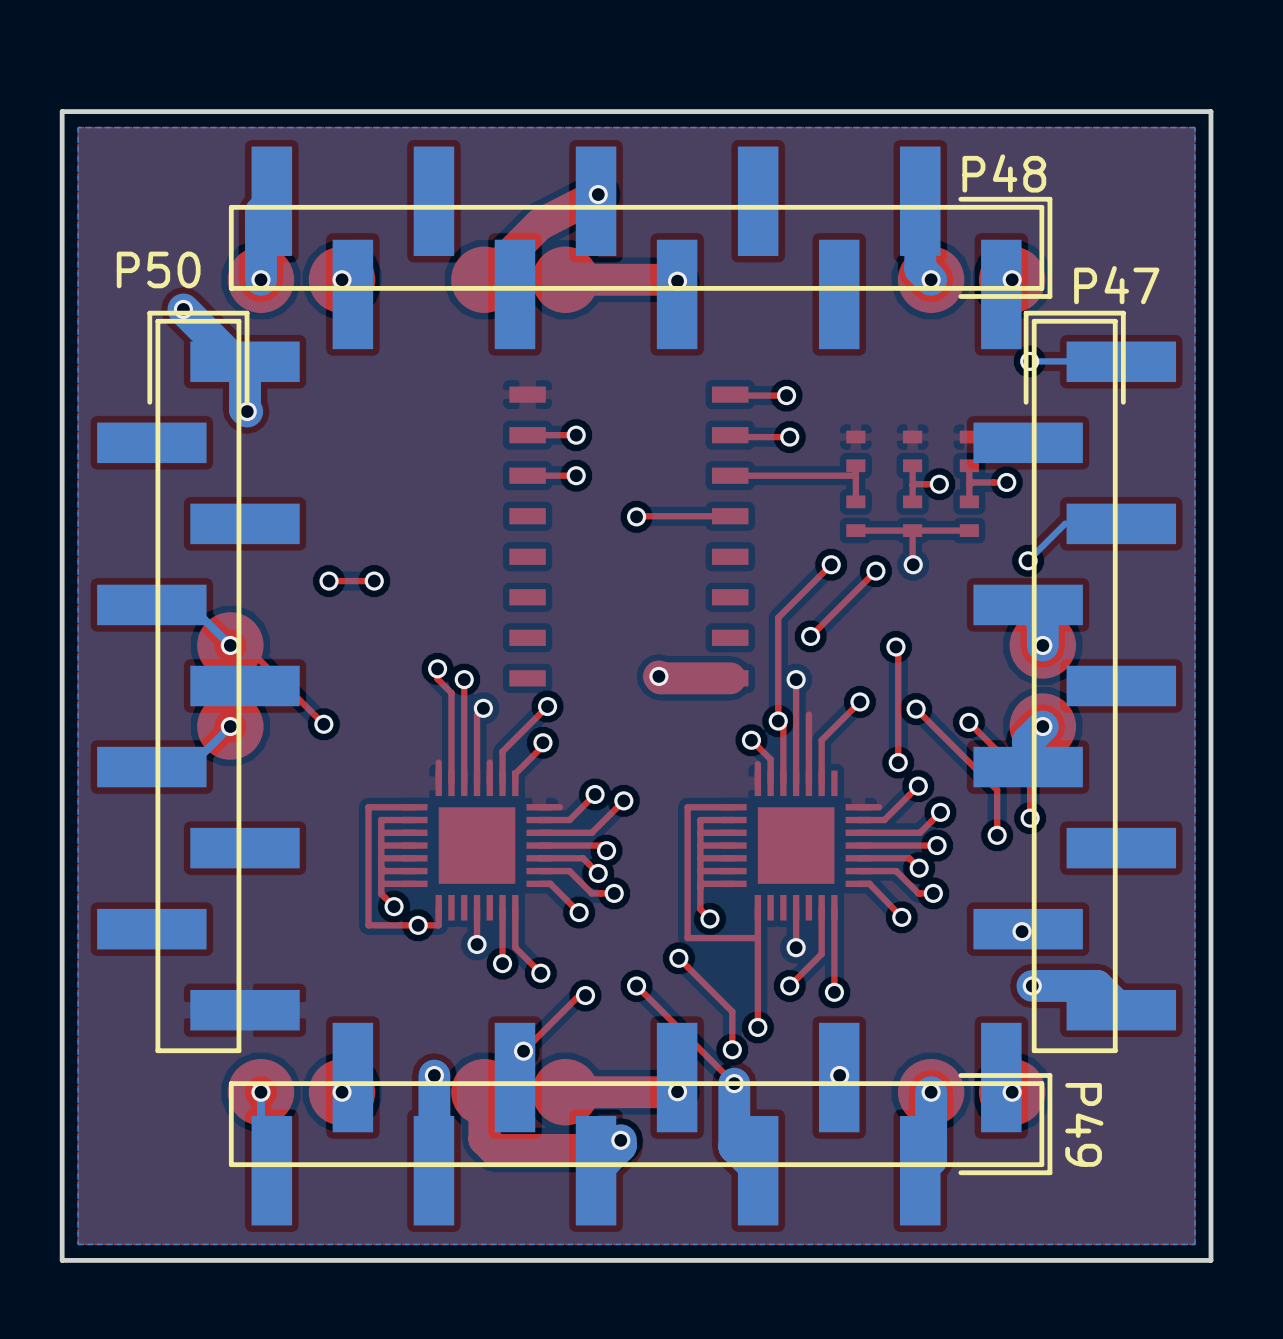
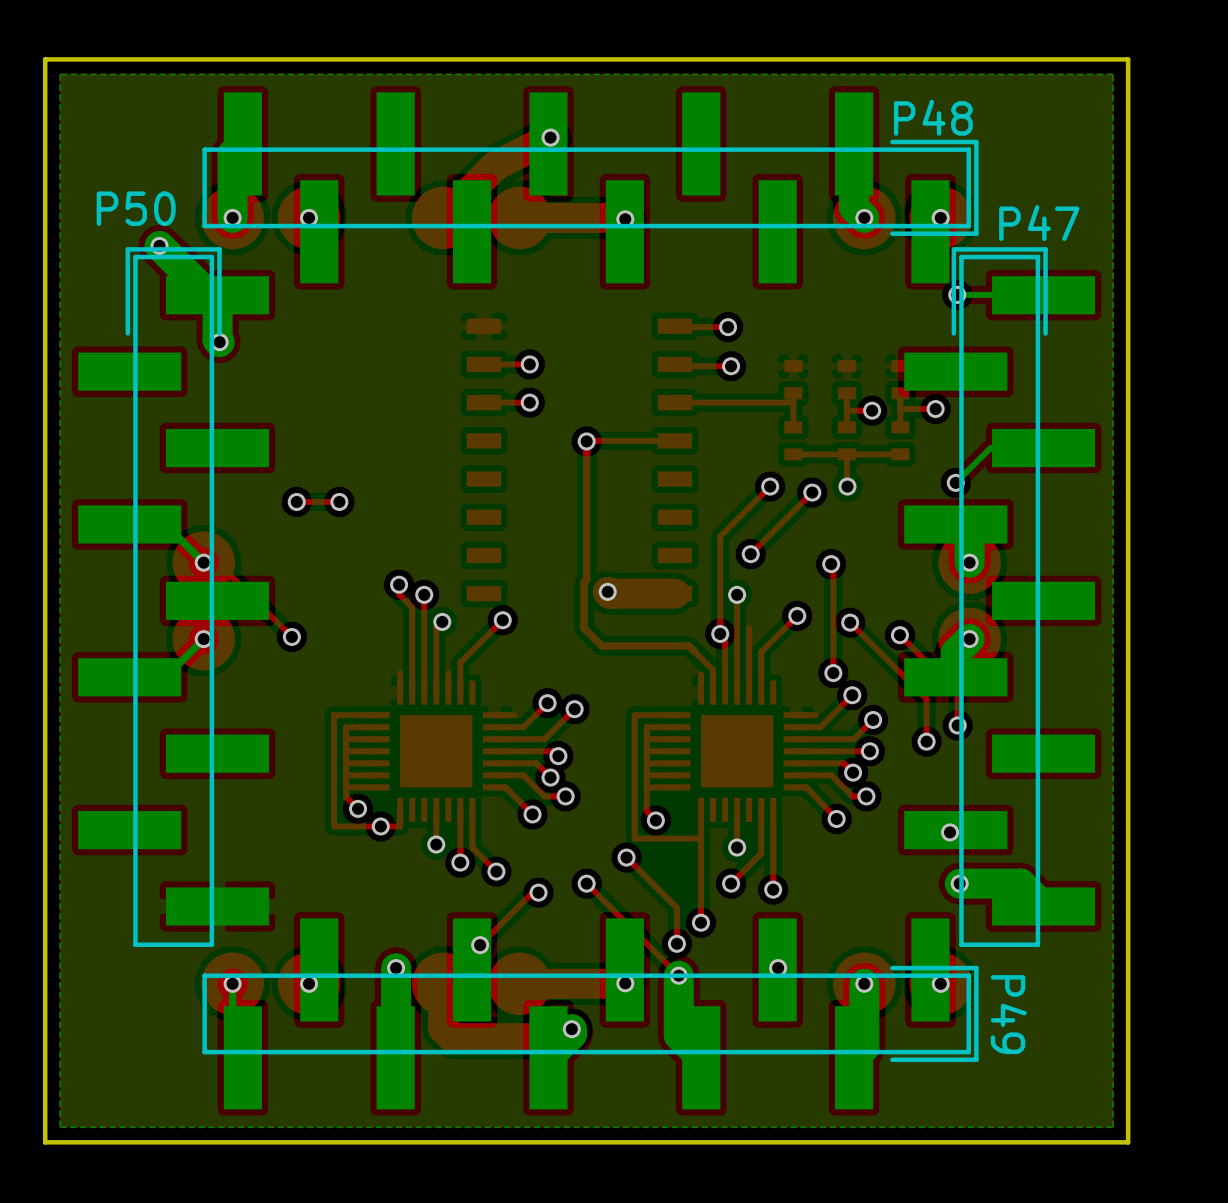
top track: none -> (586, 441) (586, 579) (584, 582) (584, 628) (601, 646) (688, 646) (694, 652)
via: (751, 740) -> none
top track: (542, 742) (542, 746) (515, 773) (515, 783) -> none
via: (542, 742) -> none

